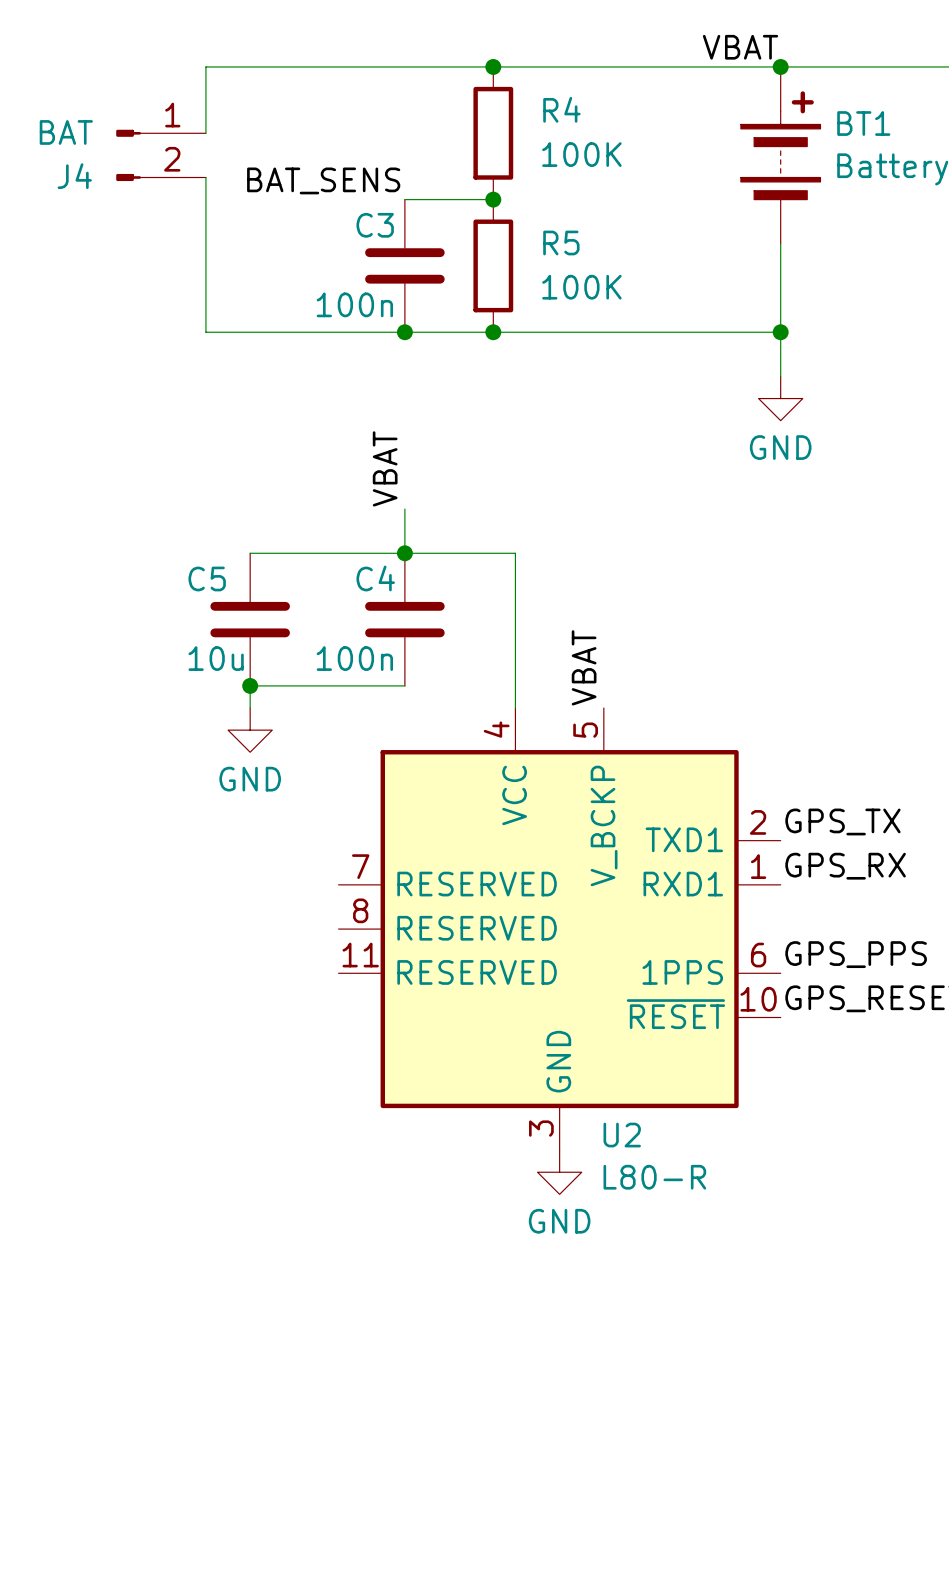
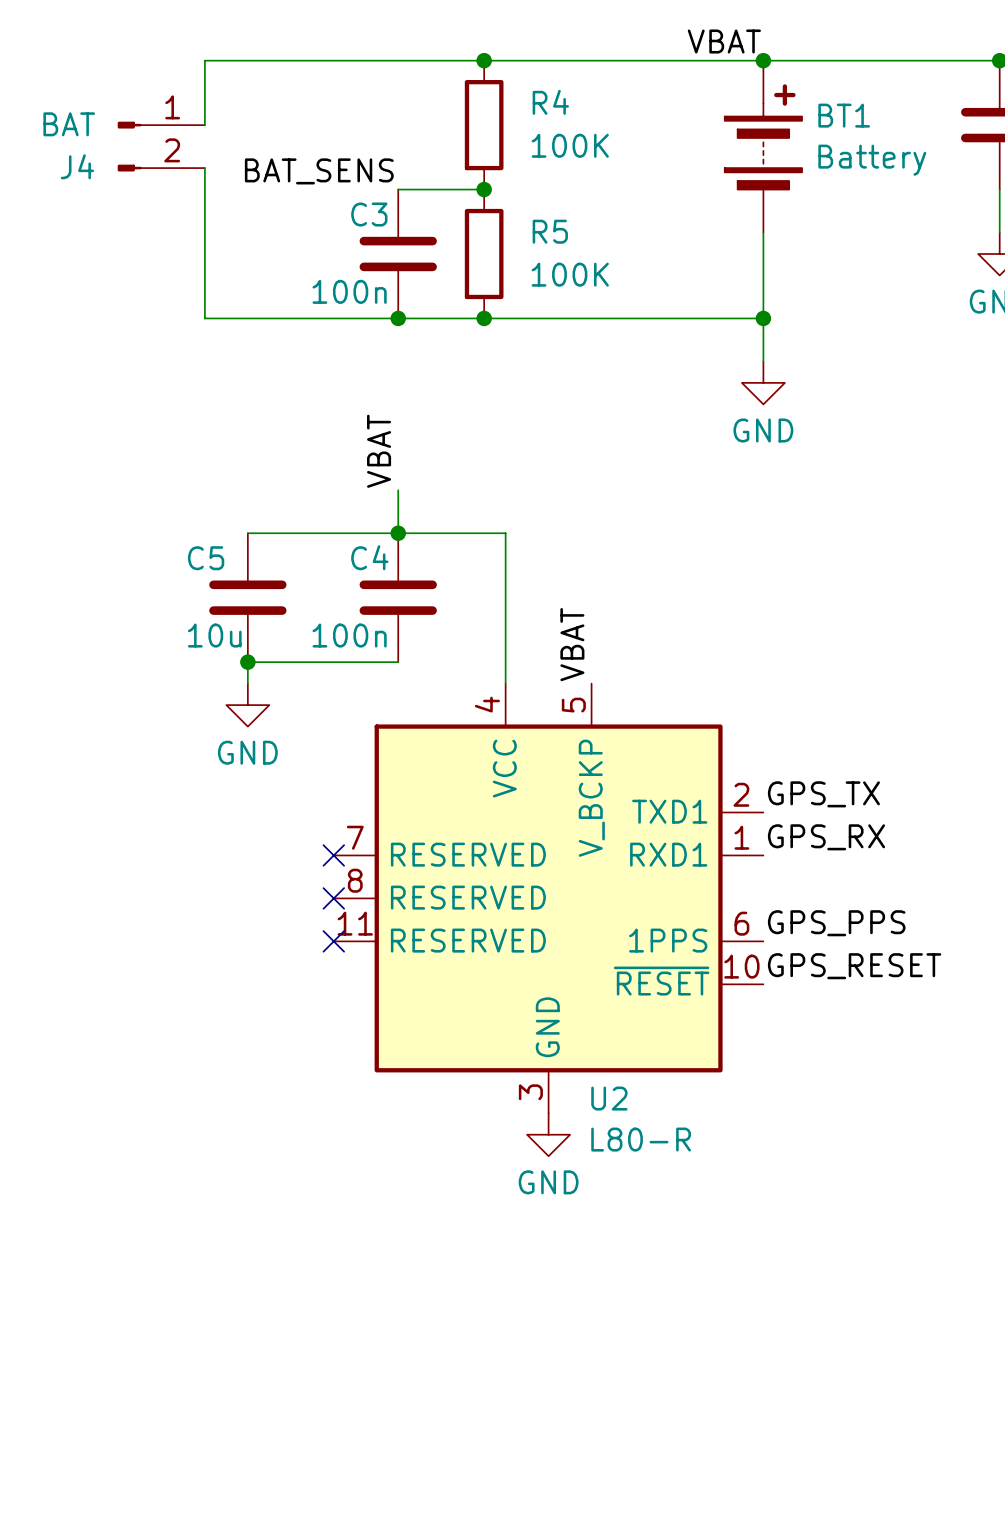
no-connect mark: none -> (333, 855)
no-connect mark: none -> (333, 898)
no-connect mark: none -> (333, 941)

